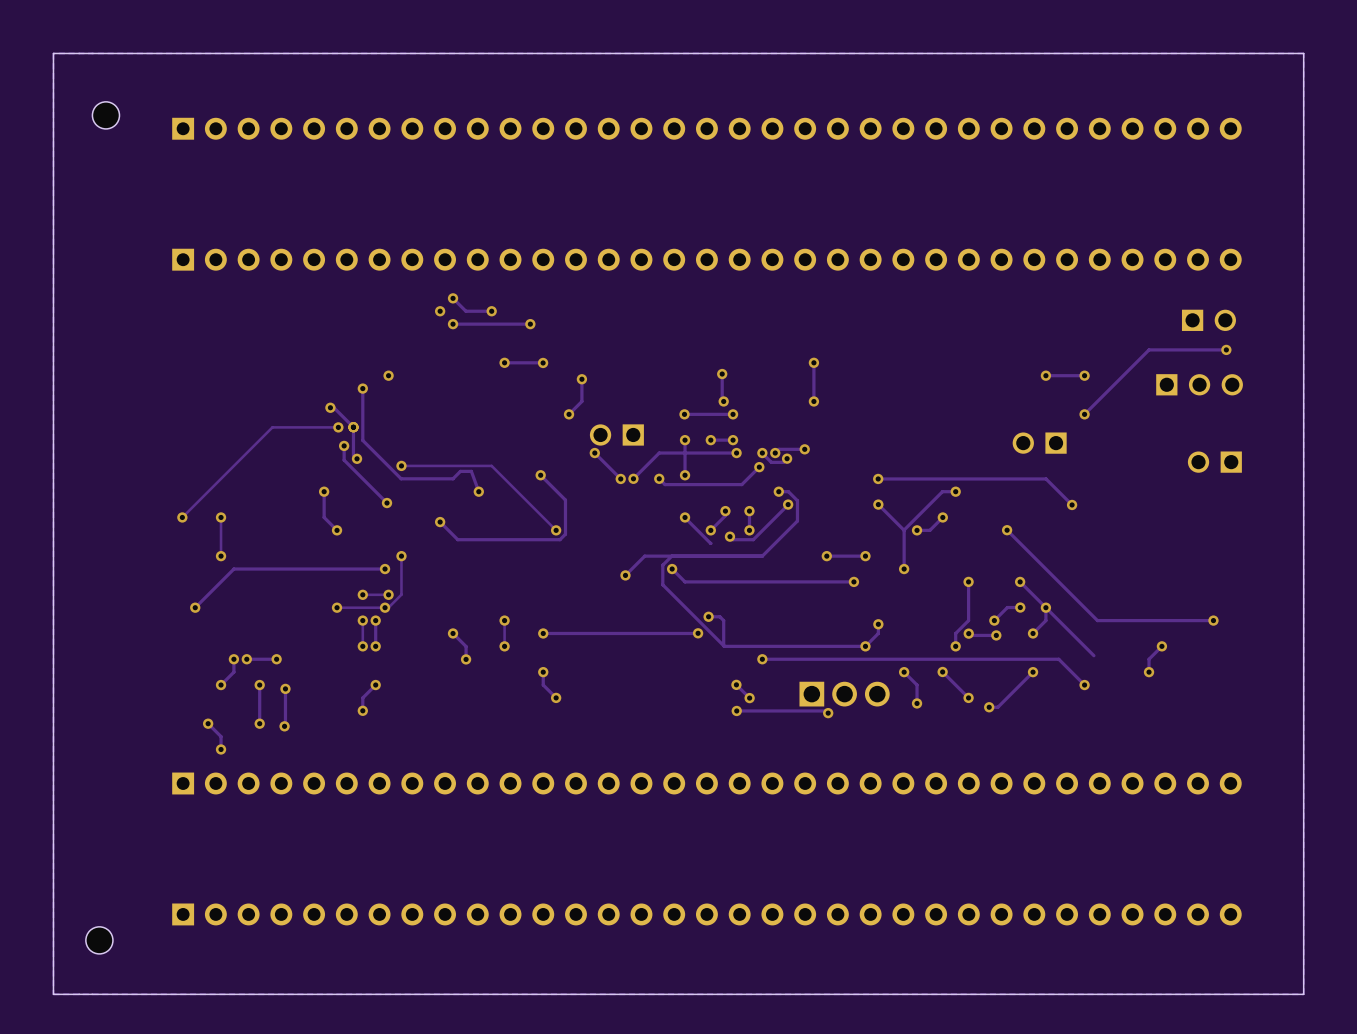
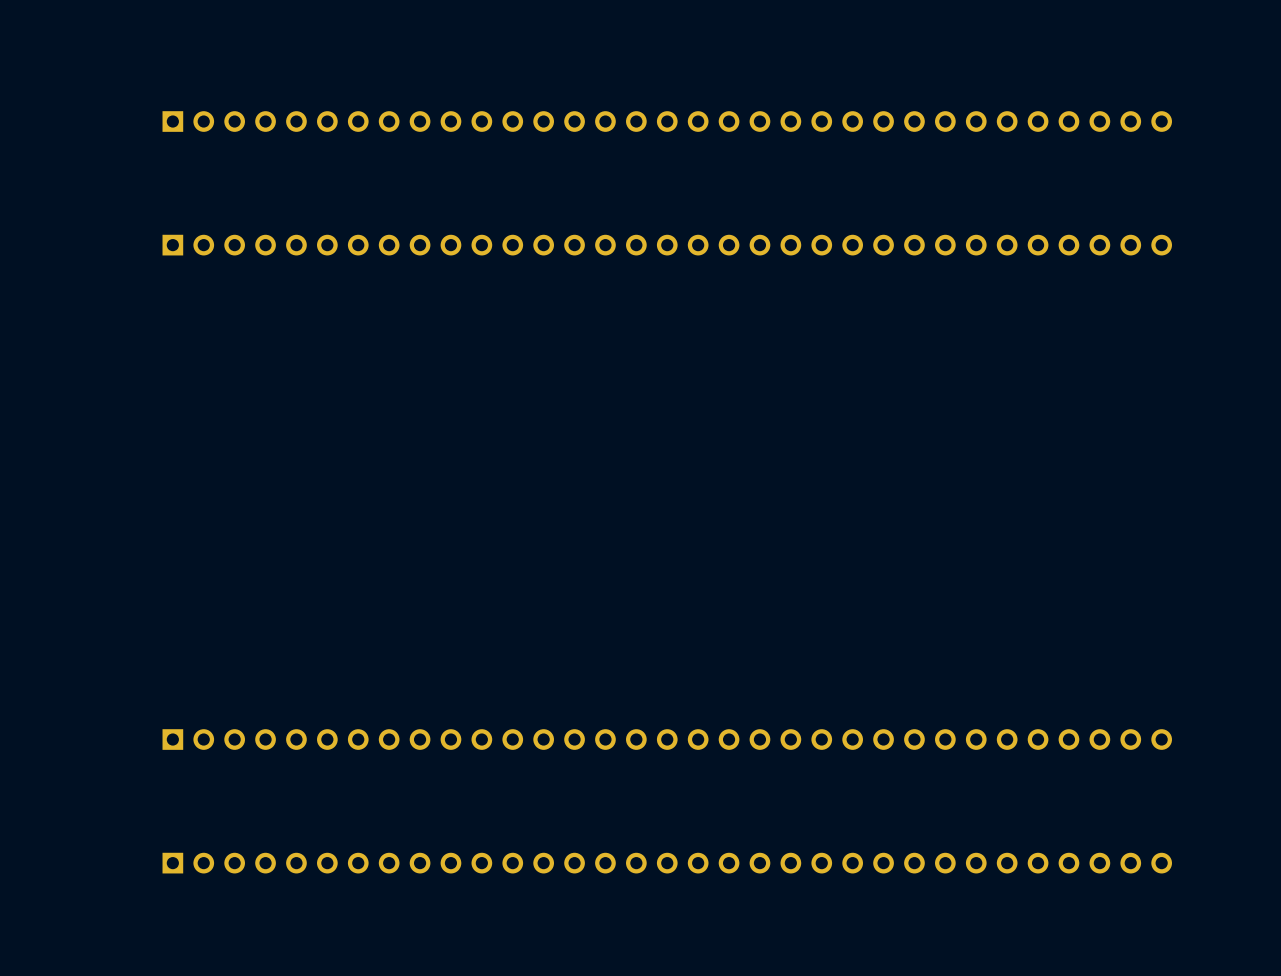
board edge: (1303, 53) (53, 53) (53, 994) (1303, 994) (1303, 53) -> none
part: (105, 115) -> none
track: (453, 298) (465, 311) (491, 311) -> none
via: (453, 298) -> none
via: (440, 311) -> none
via: (491, 311) -> none
part: (1208, 320) -> none
via: (453, 324) -> none
track: (530, 324) (453, 324) -> none
via: (530, 324) -> none
track: (1226, 349) (1149, 349) (1084, 414) -> none
via: (1226, 349) -> none
via: (504, 362) -> none
track: (542, 362) (504, 362) -> none
via: (543, 362) -> none
track: (813, 362) (813, 401) -> none
via: (813, 362) -> none
track: (722, 374) (723, 401) -> none
via: (722, 374) -> none
via: (388, 375) -> none
via: (1045, 375) -> none
track: (1084, 375) (1045, 375) -> none
via: (1084, 375) -> none
track: (581, 379) (581, 401) (569, 414) -> none
via: (581, 379) -> none
part: (1199, 384) -> none
track: (362, 388) (362, 440) (401, 478) (453, 478) (460, 471) (471, 471) (478, 491) -> none
via: (362, 388) -> none
via: (723, 401) -> none
via: (813, 401) -> none
track: (330, 407) (333, 407) (353, 427) (353, 455) (357, 458) -> none
via: (330, 407) -> none
via: (569, 414) -> none
via: (684, 414) -> none
track: (733, 414) (684, 414) -> none
via: (733, 414) -> none
via: (1084, 414) -> none
track: (338, 427) (272, 427) (182, 517) -> none
via: (338, 427) -> none
via: (353, 427) -> none
part: (616, 434) -> none
track: (685, 440) (685, 475) -> none
via: (685, 440) -> none
via: (710, 440) -> none
track: (733, 440) (710, 440) -> none
via: (733, 440) -> none
part: (1039, 443) -> none
track: (344, 445) (344, 460) (387, 503) -> none
via: (344, 445) -> none
track: (804, 449) (778, 449) (775, 453) -> none
via: (804, 449) -> none
track: (594, 453) (620, 478) -> none
via: (594, 453) -> none
track: (736, 453) (659, 453) (633, 478) -> none
via: (736, 453) -> none
track: (762, 453) (771, 462) (783, 462) (787, 458) -> none
via: (762, 453) -> none
via: (775, 453) -> none
via: (357, 458) -> none
via: (787, 458) -> none
part: (1214, 462) -> none
track: (401, 465) (491, 465) (556, 530) -> none
via: (401, 465) -> none
track: (759, 467) (741, 484) (665, 484) (659, 478) -> none
via: (759, 467) -> none
track: (540, 475) (565, 500) (565, 534) (560, 539) (457, 539) (440, 522) -> none
via: (540, 475) -> none
via: (685, 475) -> none
via: (620, 478) -> none
via: (633, 478) -> none
via: (659, 478) -> none
track: (878, 478) (1046, 478) (1072, 504) -> none
via: (878, 478) -> none
track: (324, 491) (324, 517) (337, 530) -> none
via: (324, 491) -> none
via: (478, 491) -> none
track: (778, 491) (788, 491) (797, 500) (797, 521) (762, 556) (644, 556) (625, 575) -> none
via: (778, 491) -> none
track: (955, 491) (942, 491) (904, 530) (904, 569) -> none
via: (955, 491) -> none
via: (387, 503) -> none
track: (788, 504) (753, 539) (733, 539) (729, 536) -> none
via: (788, 504) -> none
track: (878, 504) (904, 530) -> none
via: (878, 504) -> none
via: (1072, 504) -> none
track: (725, 511) (725, 515) (710, 530) -> none
via: (725, 511) -> none
track: (749, 511) (749, 530) -> none
via: (749, 511) -> none
via: (182, 517) -> none
track: (221, 517) (221, 556) -> none
via: (221, 517) -> none
track: (685, 517) (710, 543) -> none
via: (685, 517) -> none
track: (942, 517) (929, 530) (917, 530) -> none
via: (942, 517) -> none
via: (440, 522) -> none
via: (337, 530) -> none
via: (556, 530) -> none
via: (710, 530) -> none
via: (749, 530) -> none
via: (917, 530) -> none
track: (1007, 530) (1097, 620) (1213, 620) -> none
via: (1007, 530) -> none
via: (729, 536) -> none
via: (221, 556) -> none
track: (401, 556) (401, 594) (388, 607) (337, 607) -> none
via: (401, 556) -> none
track: (671, 556) (662, 565) (662, 584) (724, 646) (865, 646) (878, 633) (878, 624) -> none
via: (826, 556) -> none
track: (865, 556) (826, 556) -> none
via: (865, 556) -> none
track: (385, 569) (233, 569) (195, 607) -> none
via: (385, 569) -> none
track: (672, 569) (685, 581) (853, 581) -> none
via: (672, 569) -> none
via: (904, 569) -> none
via: (625, 575) -> none
via: (853, 581) -> none
track: (968, 581) (968, 620) (955, 633) (955, 646) -> none
via: (968, 581) -> none
track: (1020, 581) (1093, 655) -> none
via: (1020, 581) -> none
via: (362, 594) -> none
track: (388, 594) (362, 594) -> none
via: (388, 594) -> none
via: (195, 607) -> none
via: (337, 607) -> none
via: (385, 607) -> none
track: (1020, 607) (1007, 607) (994, 620) -> none
via: (1020, 607) -> none
track: (1045, 607) (1045, 620) (1033, 633) -> none
via: (1045, 607) -> none
track: (708, 616) (719, 616) (723, 620) (723, 645) -> none
via: (708, 616) -> none
track: (362, 620) (362, 646) -> none
via: (362, 620) -> none
track: (375, 620) (375, 646) -> none
via: (375, 620) -> none
track: (504, 620) (504, 646) -> none
via: (504, 620) -> none
via: (994, 620) -> none
via: (1213, 620) -> none
via: (878, 624) -> none
track: (453, 633) (466, 646) (466, 659) -> none
via: (453, 633) -> none
via: (543, 633) -> none
track: (697, 633) (543, 633) -> none
via: (698, 633) -> none
track: (968, 633) (970, 635) (996, 635) -> none
via: (968, 633) -> none
via: (1033, 633) -> none
via: (996, 635) -> none
via: (362, 646) -> none
via: (375, 646) -> none
via: (504, 646) -> none
via: (865, 646) -> none
via: (955, 646) -> none
track: (1161, 646) (1149, 659) (1149, 672) -> none
via: (1161, 646) -> none
track: (233, 659) (233, 672) (221, 685) -> none
via: (233, 659) -> none
via: (246, 659) -> none
track: (276, 659) (246, 659) -> none
via: (276, 659) -> none
via: (466, 659) -> none
track: (762, 659) (1058, 659) (1084, 685) -> none
via: (762, 659) -> none
track: (942, 671) (968, 697) -> none
via: (942, 671) -> none
track: (543, 672) (543, 685) (556, 697) -> none
via: (543, 672) -> none
track: (904, 672) (917, 685) (917, 703) -> none
via: (904, 672) -> none
track: (1033, 672) (997, 707) (989, 707) -> none
via: (1033, 672) -> none
via: (1149, 672) -> none
track: (736, 684) (749, 698) -> none
via: (736, 684) -> none
via: (221, 685) -> none
track: (259, 685) (259, 723) -> none
via: (259, 685) -> none
track: (375, 685) (362, 697) (362, 710) -> none
via: (375, 685) -> none
via: (1084, 685) -> none
track: (285, 688) (284, 726) -> none
via: (285, 688) -> none
part: (844, 694) -> none
via: (556, 697) -> none
via: (968, 697) -> none
via: (749, 698) -> none
via: (917, 703) -> none
via: (989, 707) -> none
via: (362, 710) -> none
track: (736, 710) (826, 710) (828, 713) -> none
via: (736, 710) -> none
via: (828, 713) -> none
track: (208, 723) (221, 736) (221, 749) -> none
via: (208, 723) -> none
via: (259, 723) -> none
via: (284, 726) -> none
via: (221, 749) -> none
part: (99, 940) -> none

